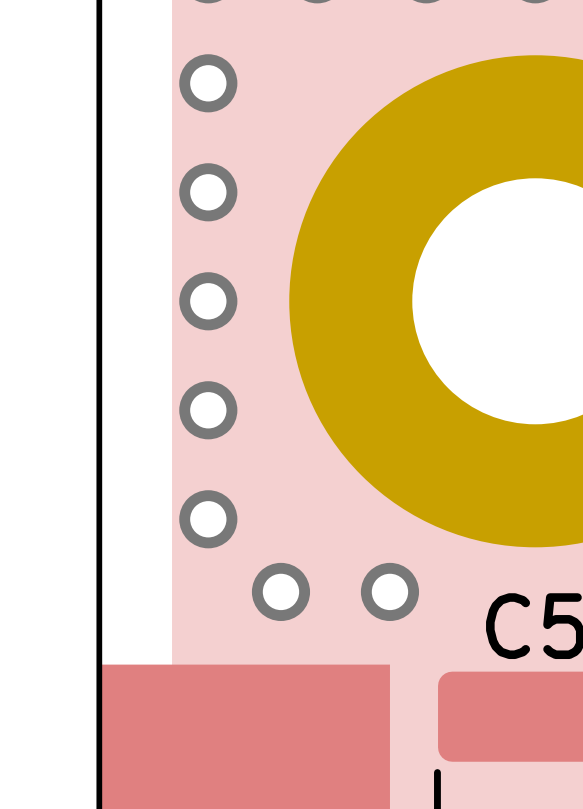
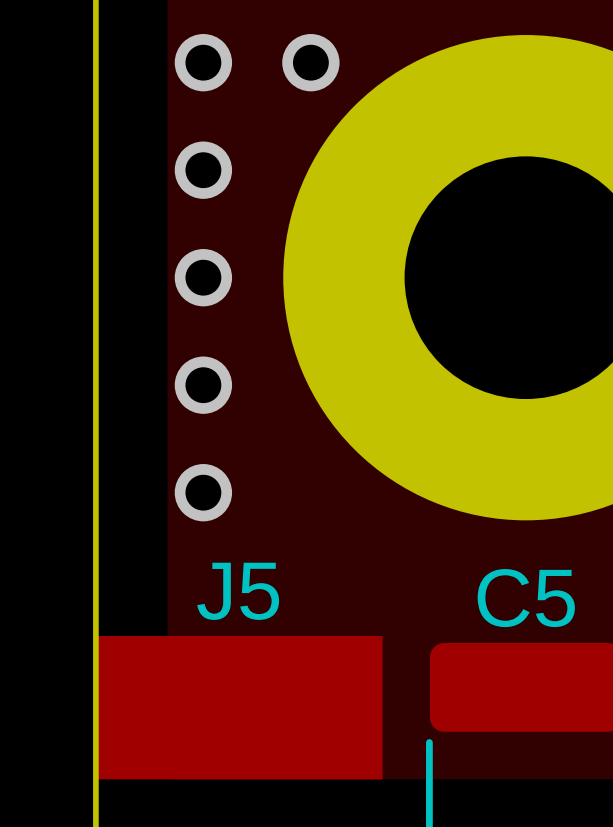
via: none -> (310, 62)
via: (280, 591) -> none
via: (389, 591) -> none
J5 name: none -> J5 (238, 591)

